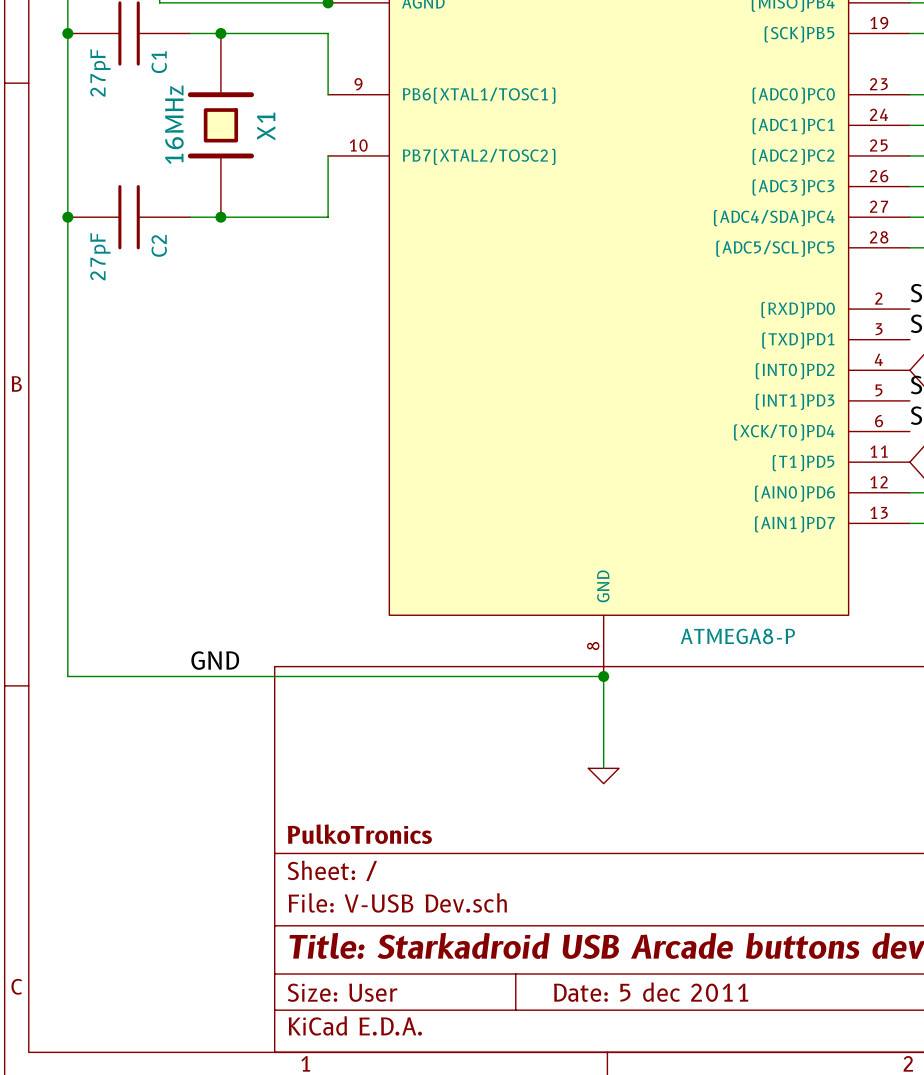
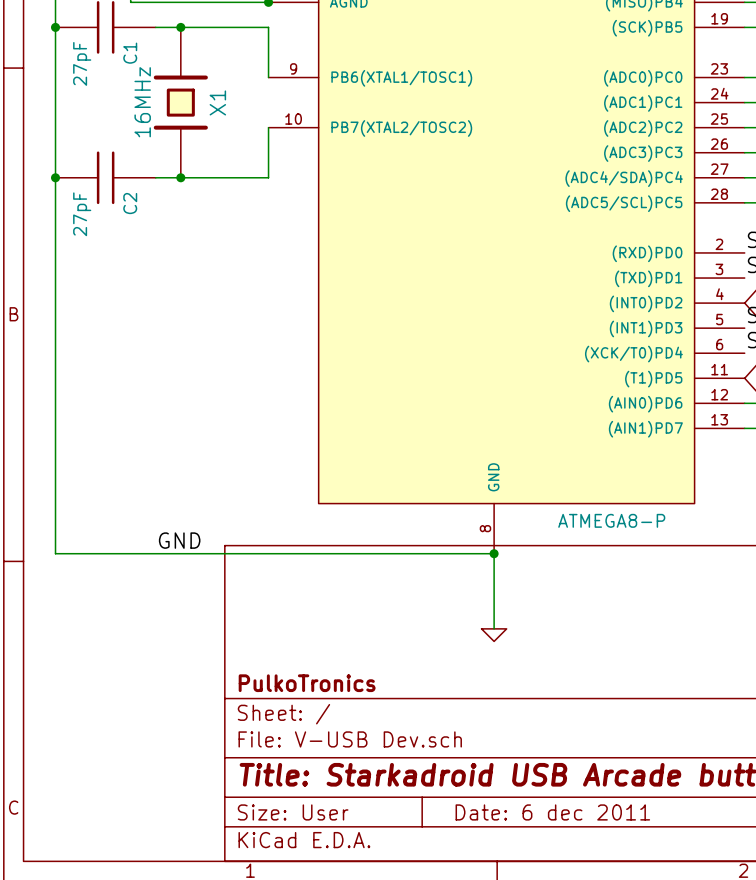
title block: Date: 5 dec 2011 (651, 992) -> Date: 6 dec 2011 (552, 812)

